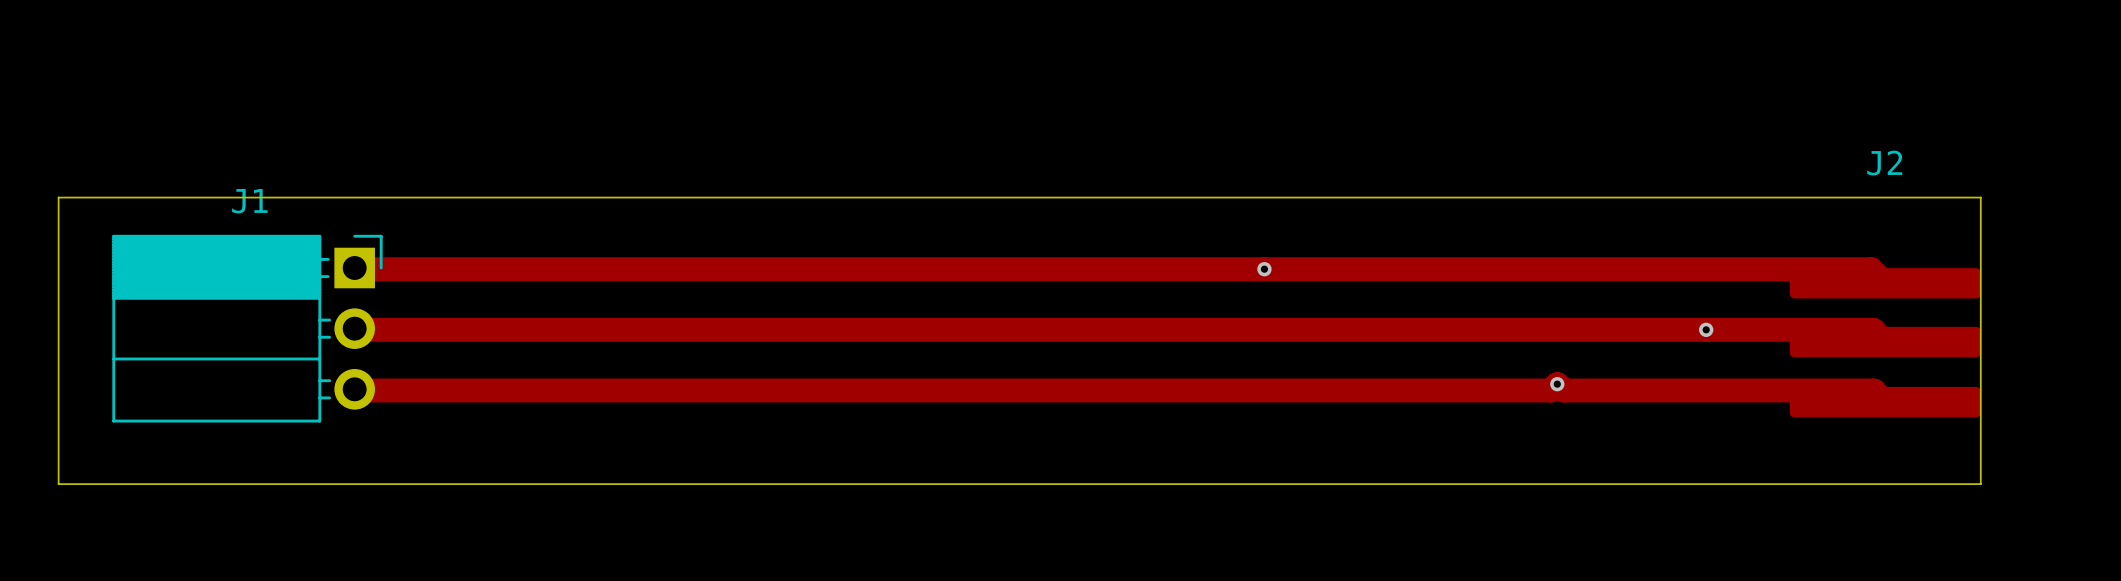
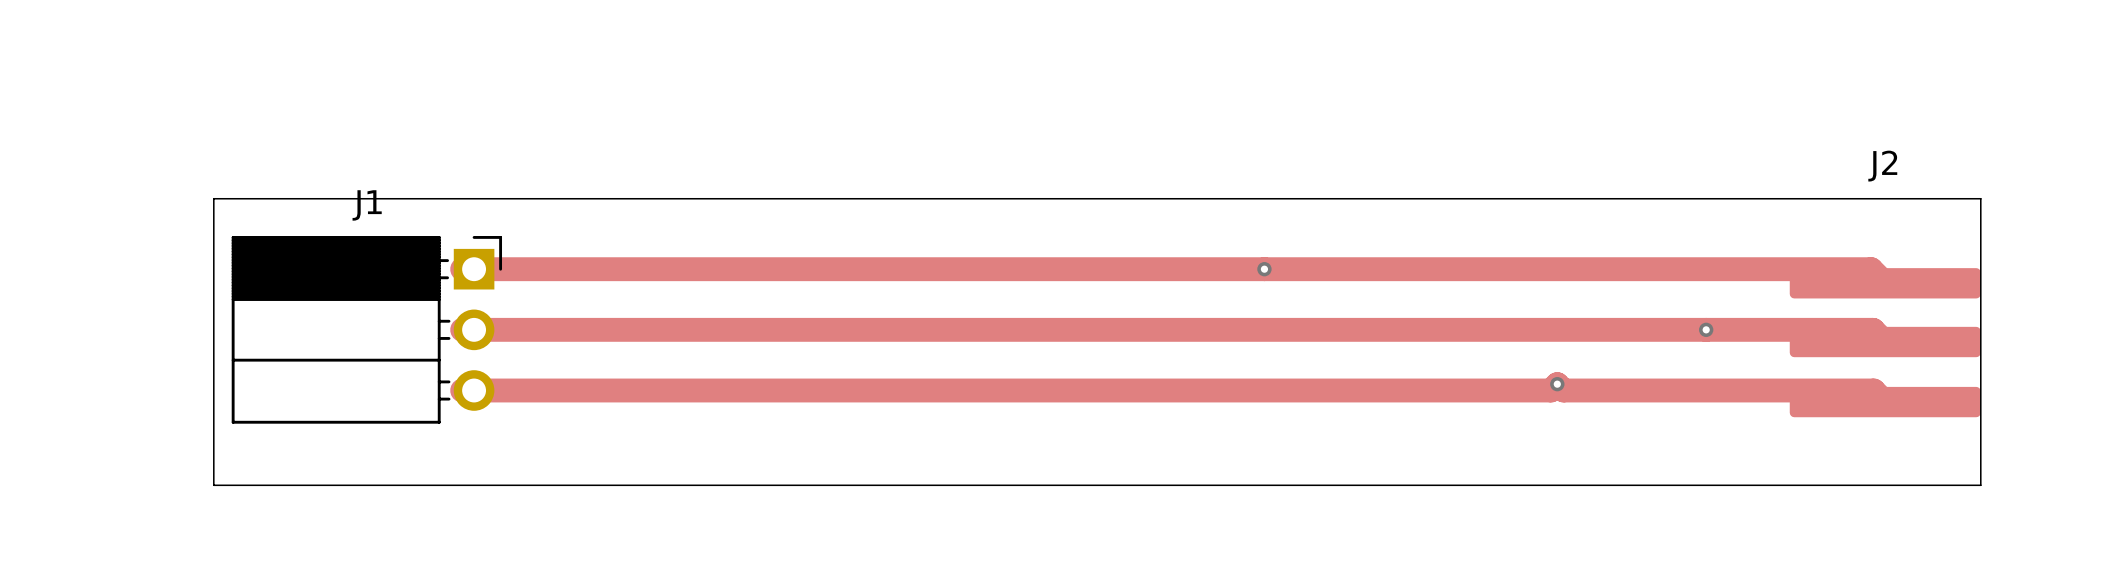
board edge: (1980, 198) (58, 197) (58, 484) (1980, 484) -> (1980, 198) (213, 198) (213, 485) (1980, 484)
track: (354, 268) (462, 269) -> none
J1 position: (247, 328) -> (366, 329)
track: (354, 328) (462, 329) -> none
track: (354, 389) (462, 390) -> none

